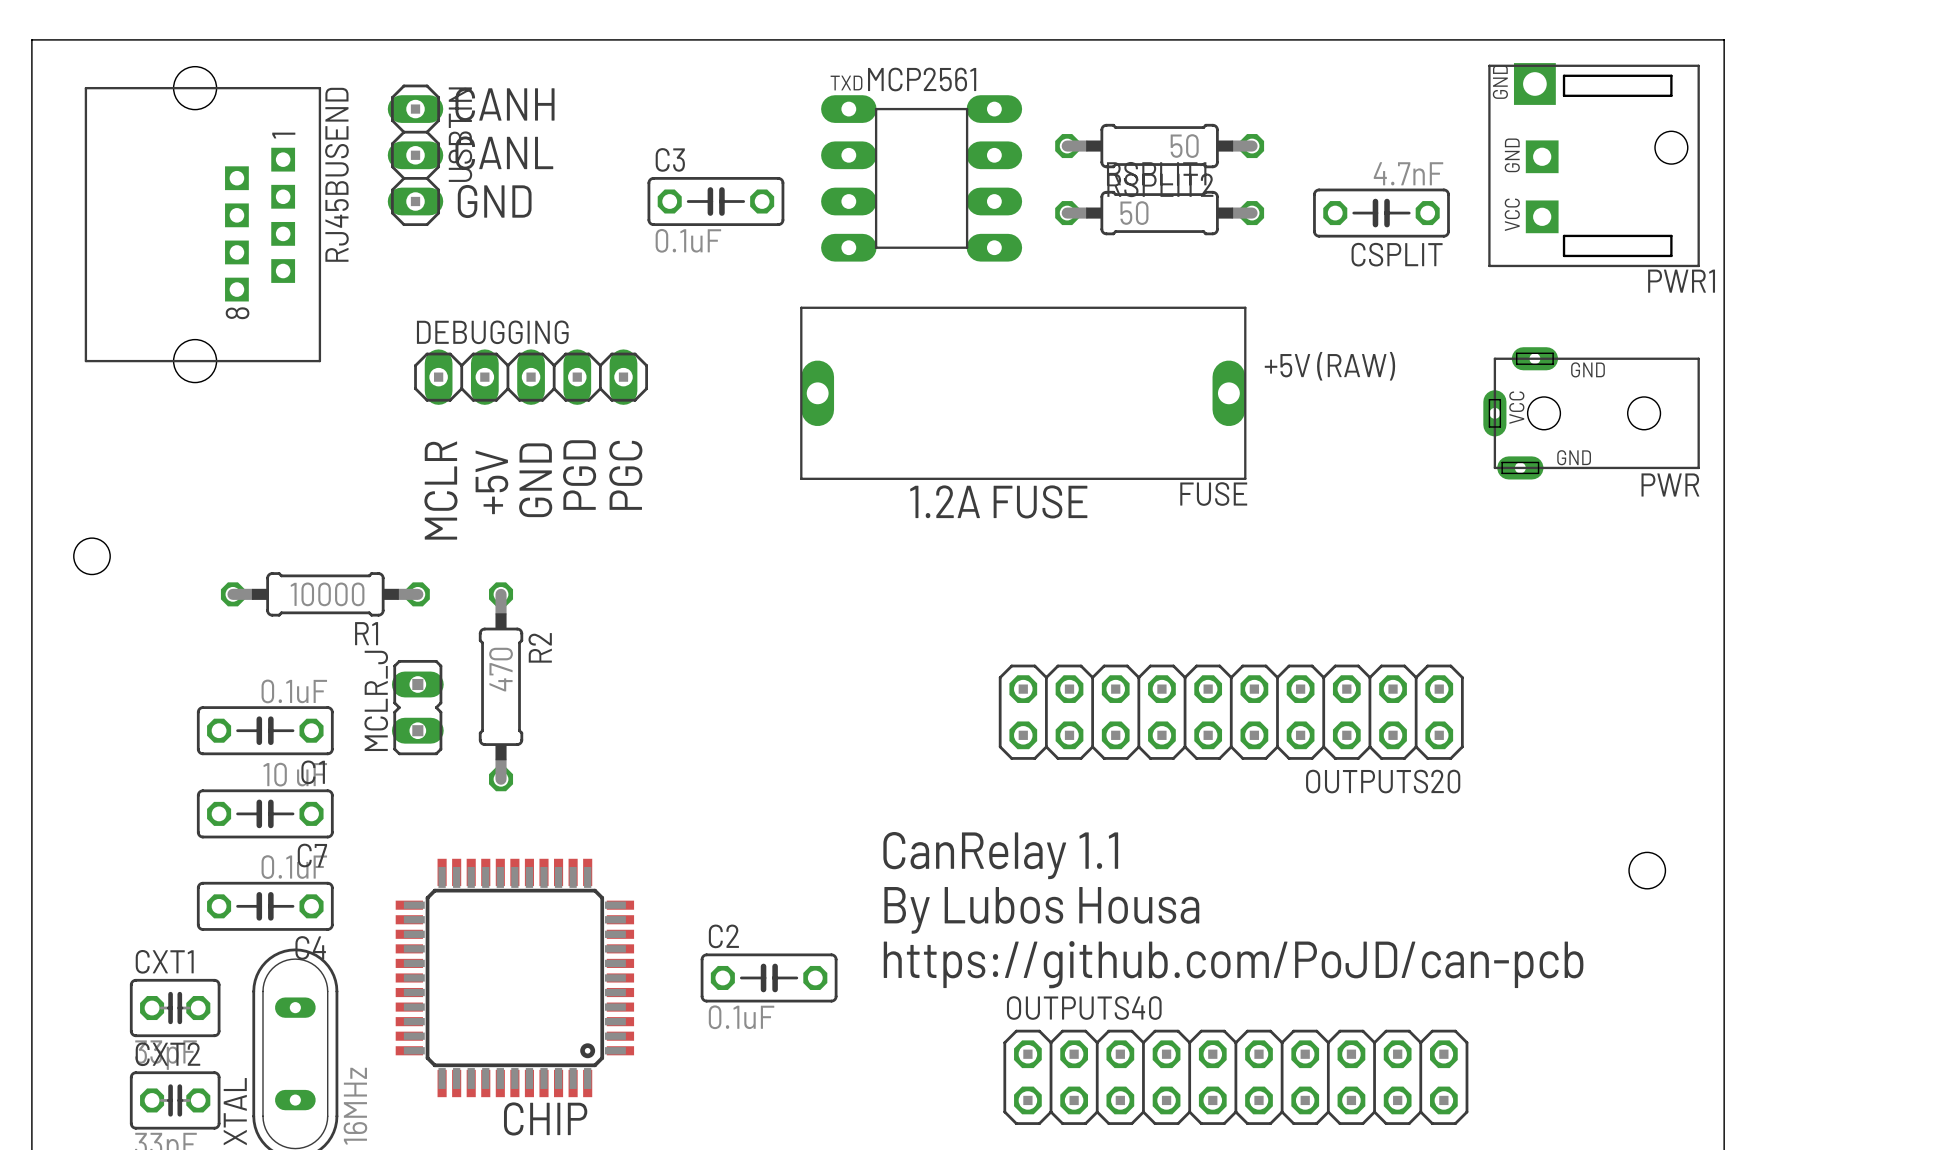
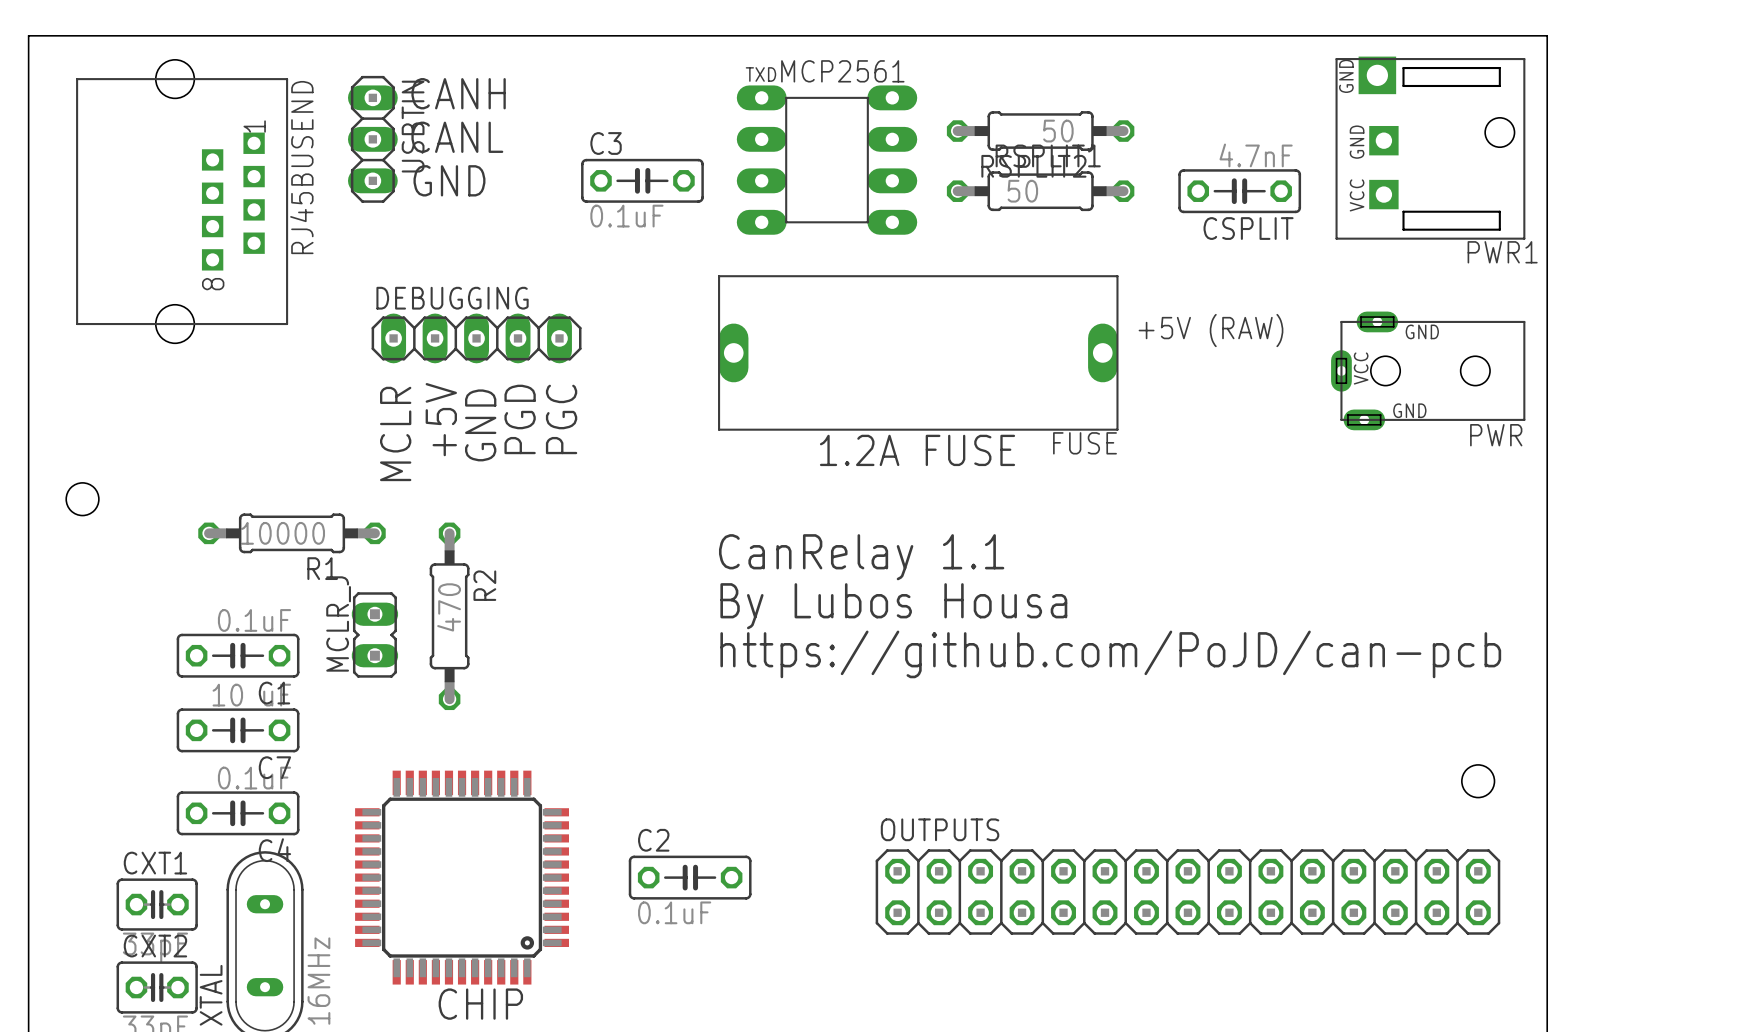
OUTPUTS20: (1231, 712) -> none
text position: CanRelay 1.1 (1000, 855) -> CanRelay 1.1 (861, 557)
text position: By Lubos Housa (1041, 910) -> By Lubos Housa (893, 606)
text position: https://github.com/PoJD/can-pcb (1233, 964) -> https://github.com/PoJD/can-pcb (1110, 654)
OUTPUTS: none -> (1187, 892)
OUTPUTS40: (1235, 1077) -> none

